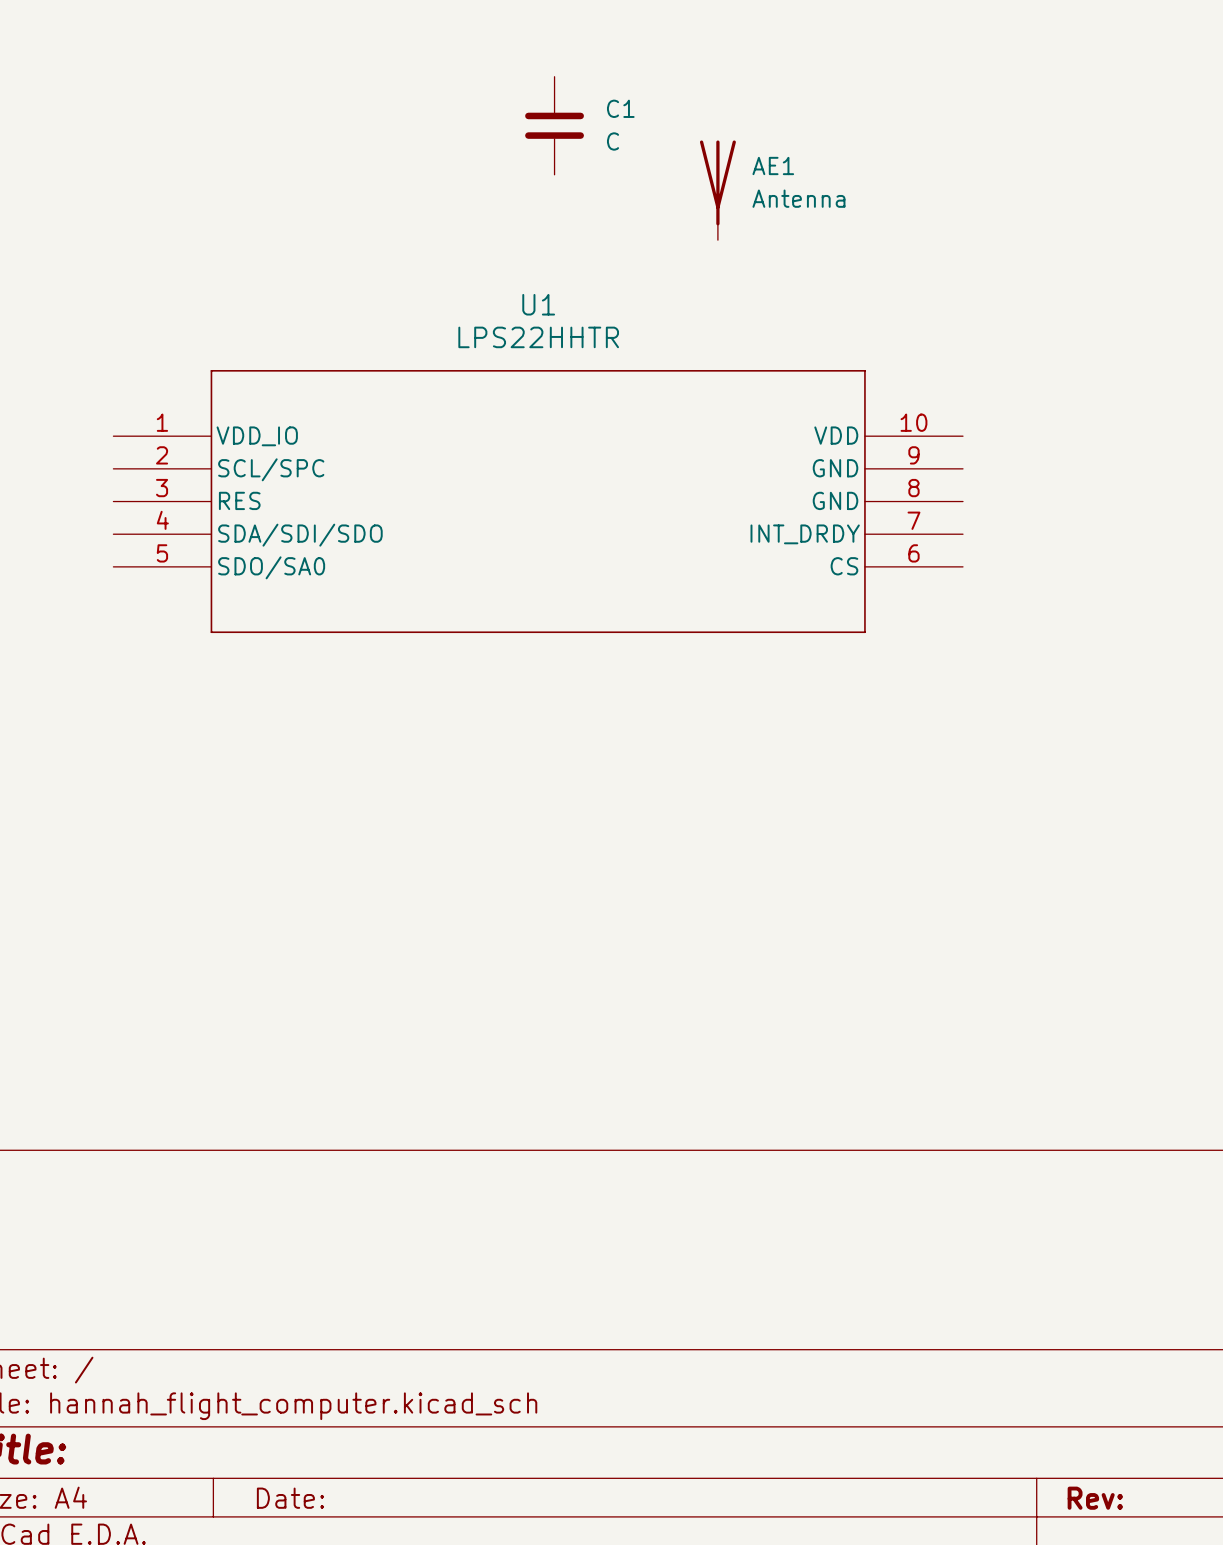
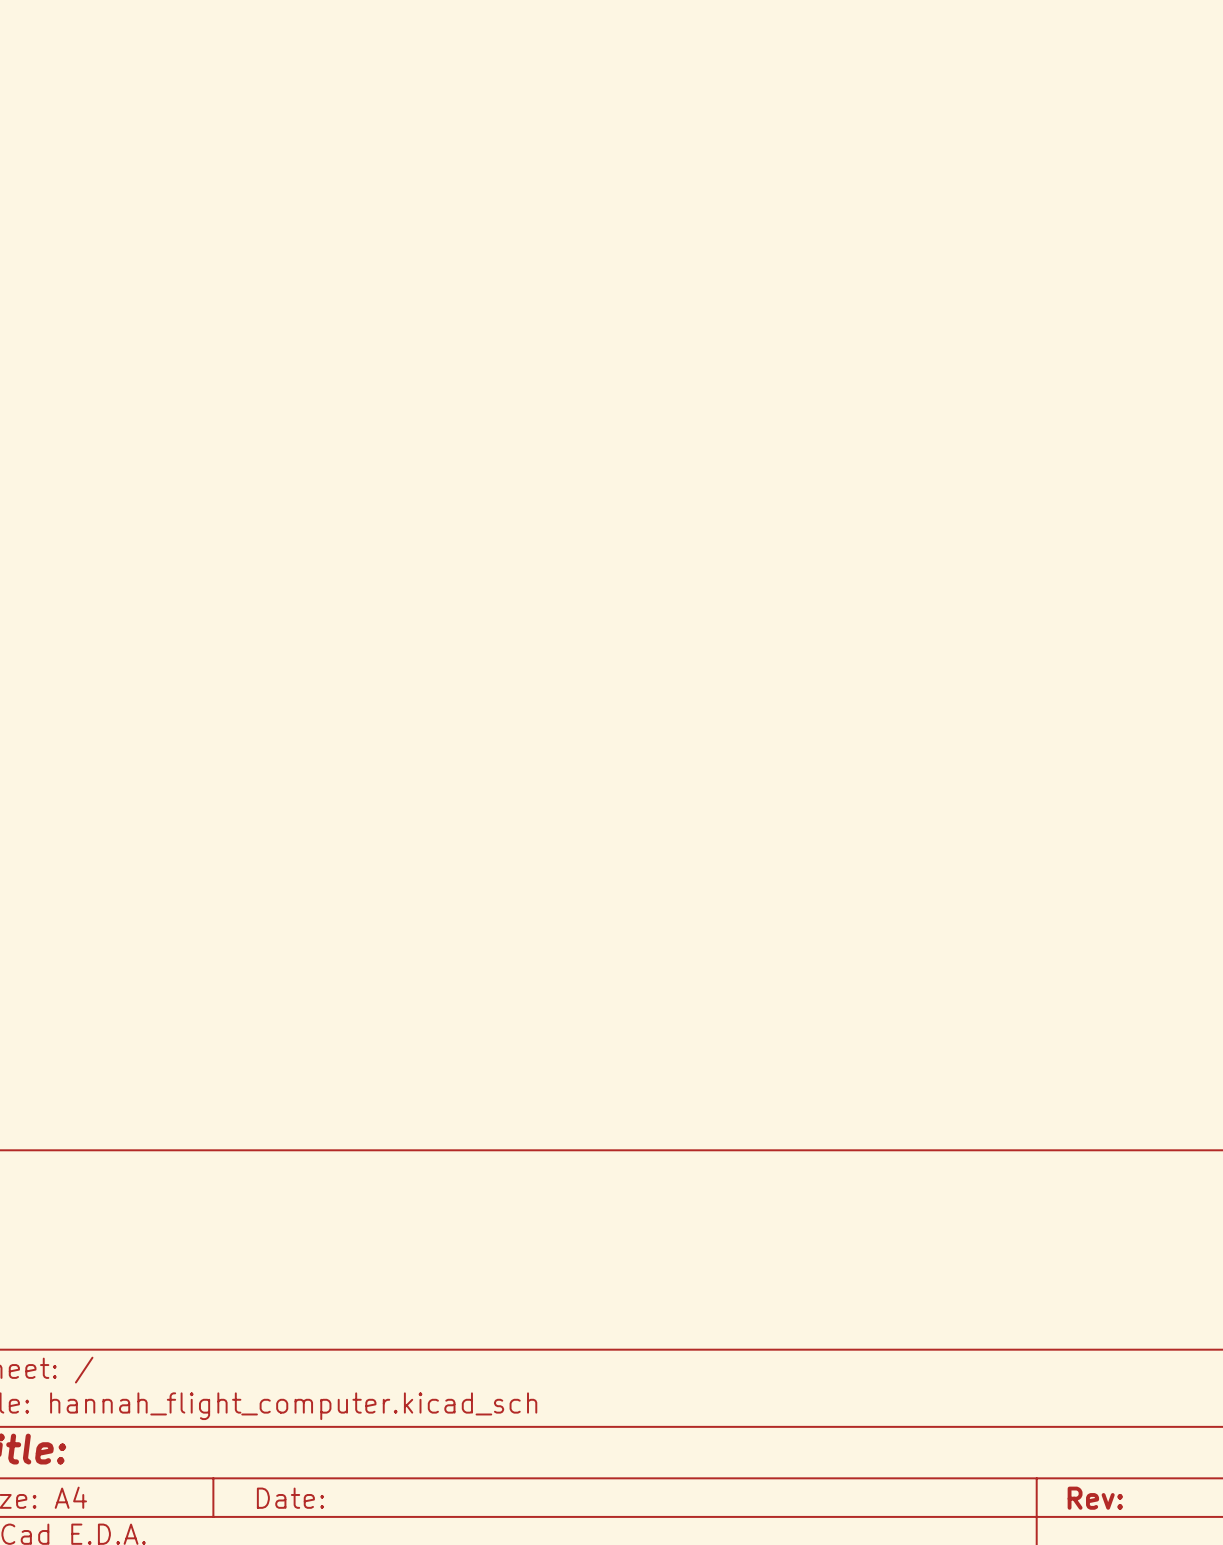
C1: C (554, 125) -> none
AE1: Antenna (717, 190) -> none
U1: LPS22HHTR (538, 501) -> none

